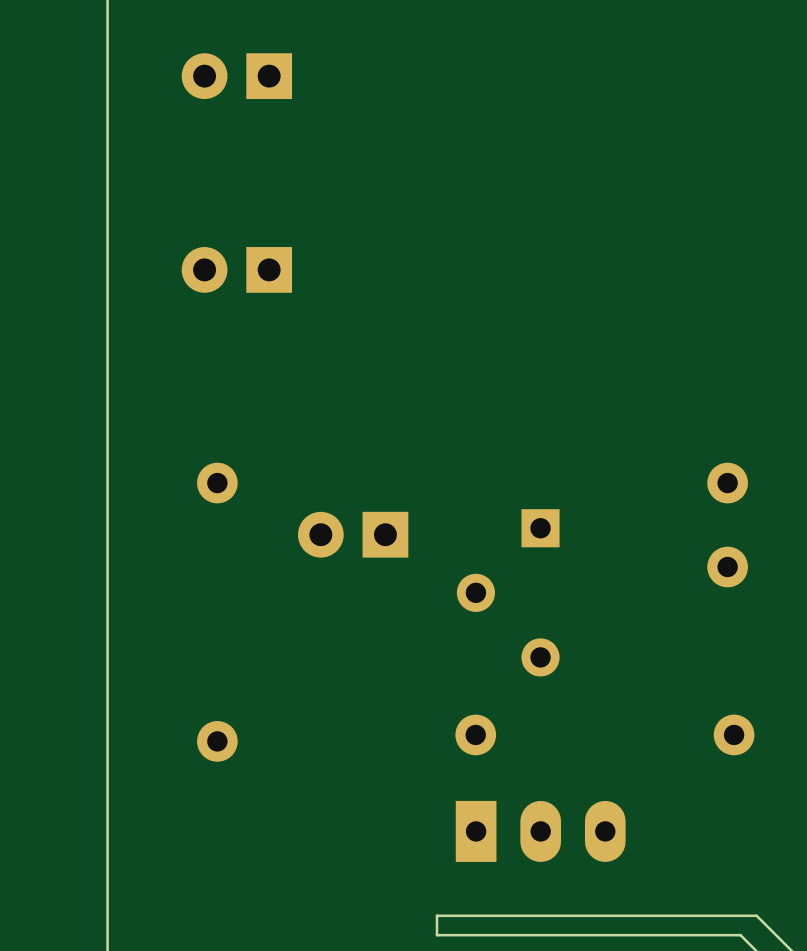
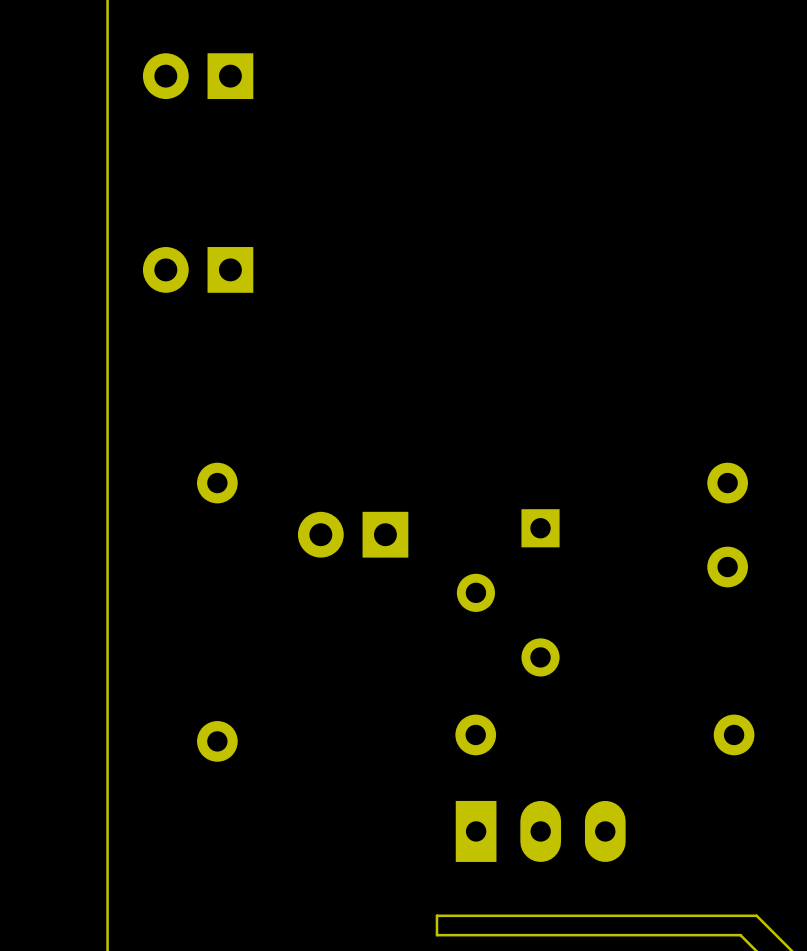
part position: (236, 76) -> (198, 76)
part position: (236, 269) -> (198, 269)

